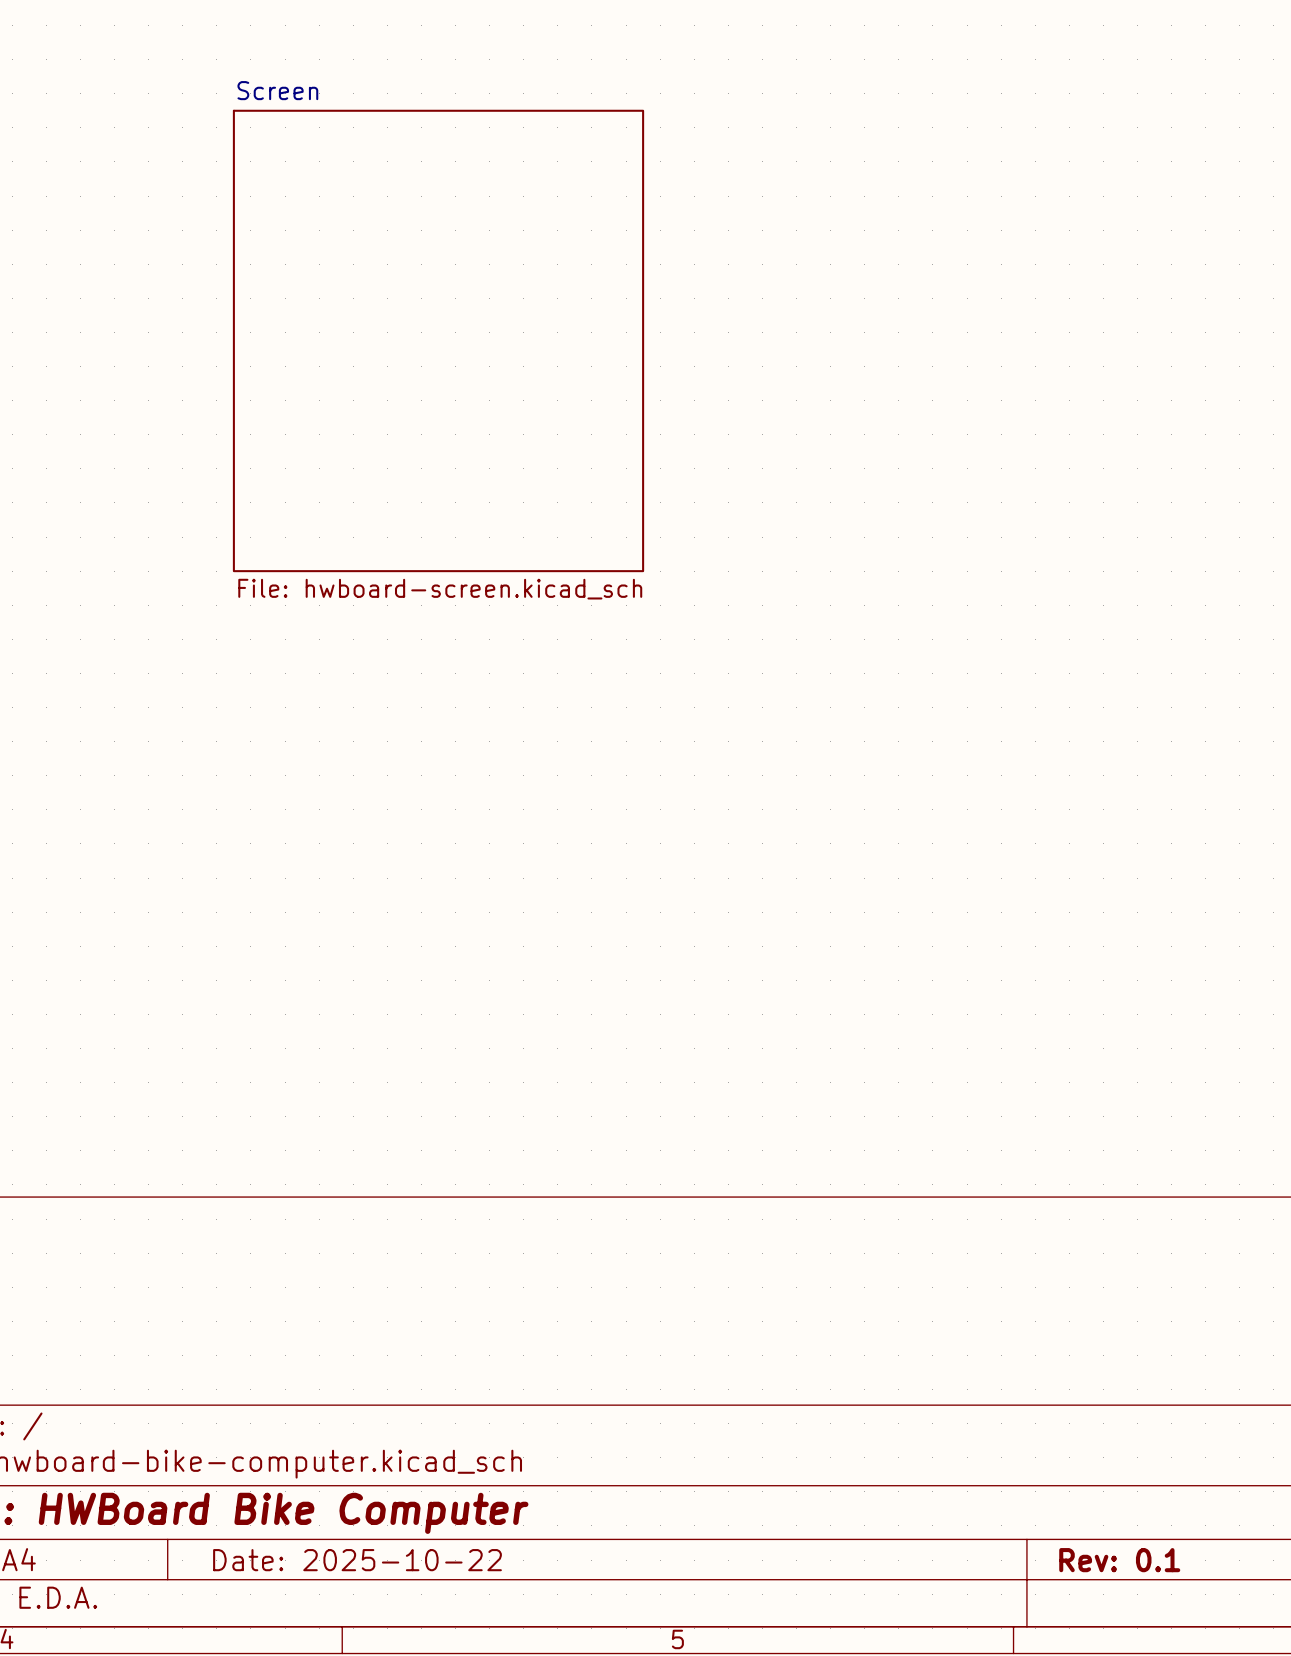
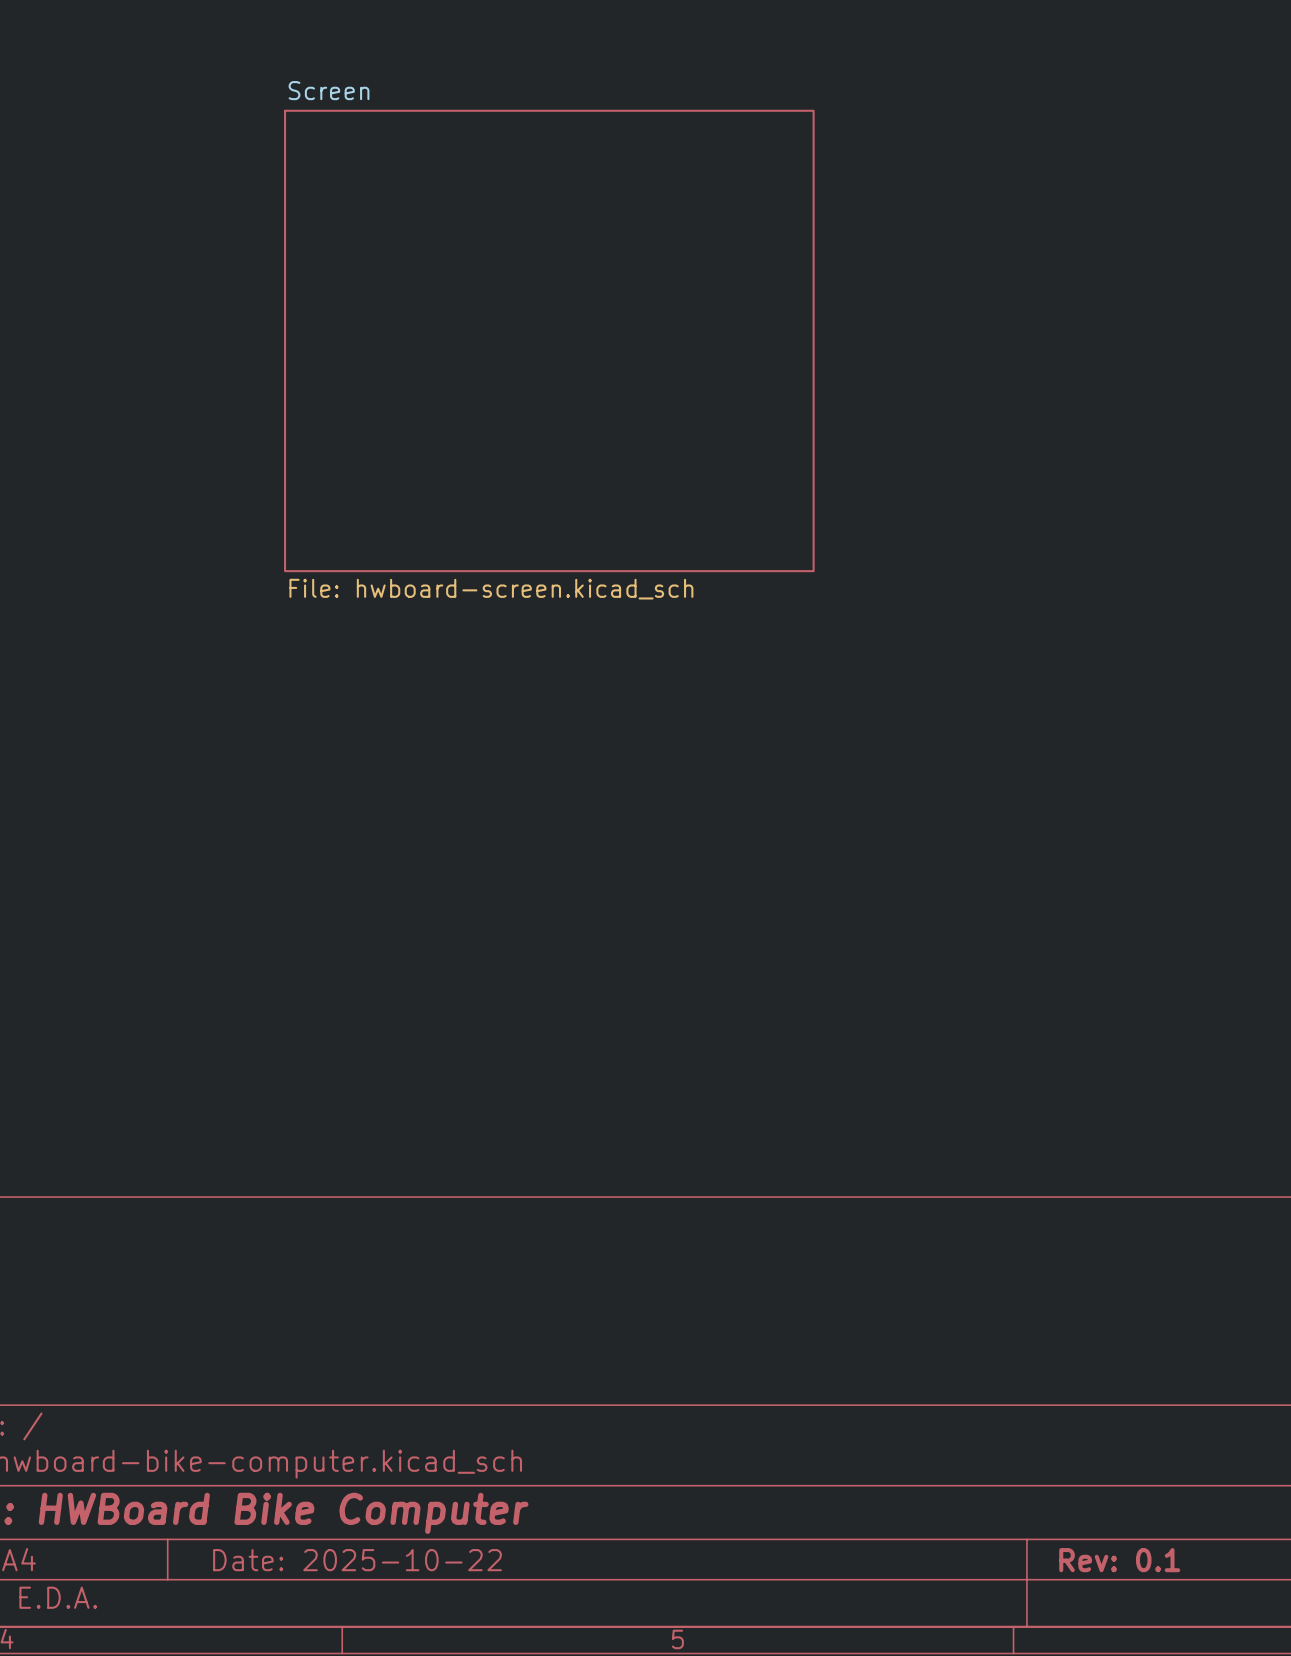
sheet Screen: File: hwboard-screen.kicad_sch (438, 340) -> none
sheet Screen: none -> File: hwboard-screen.kicad_sch (549, 340)

